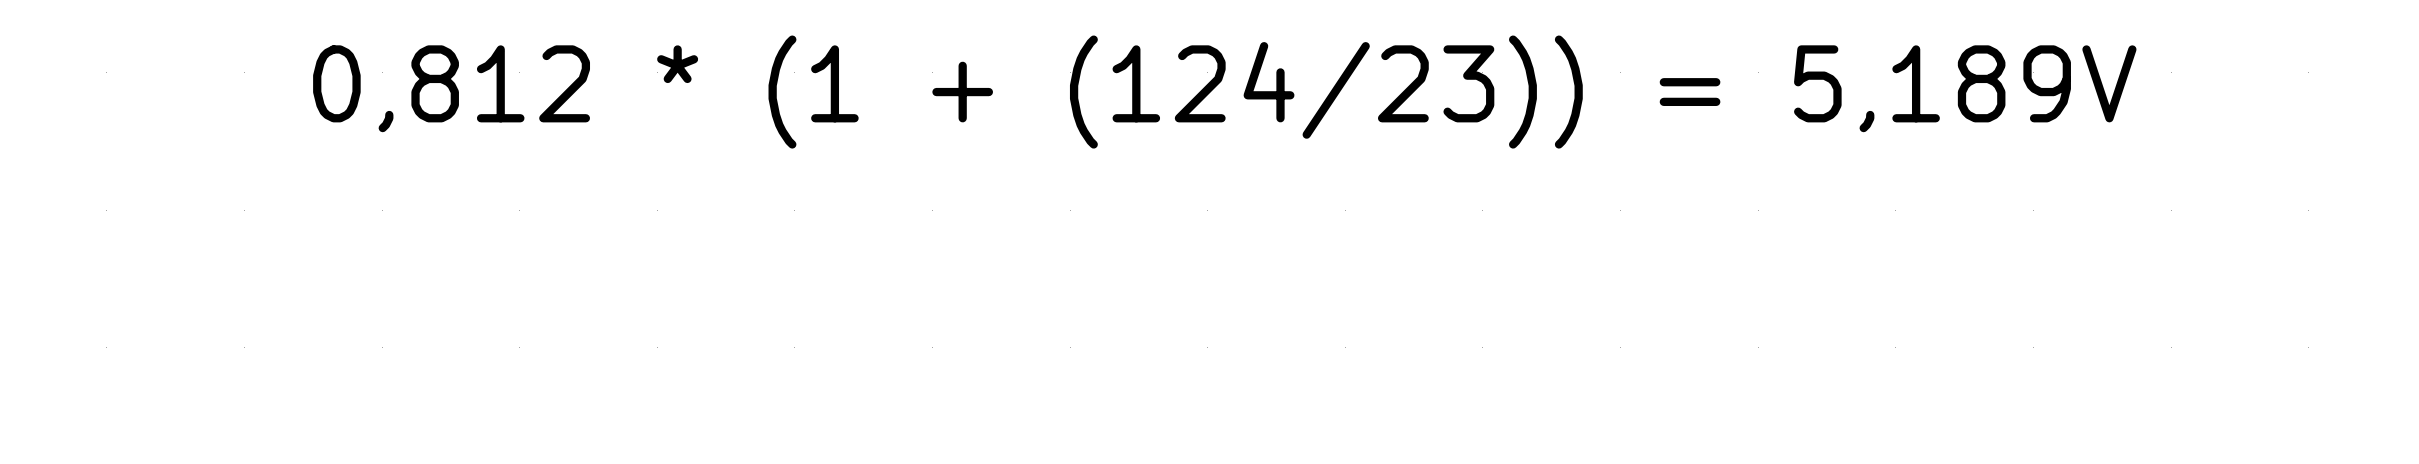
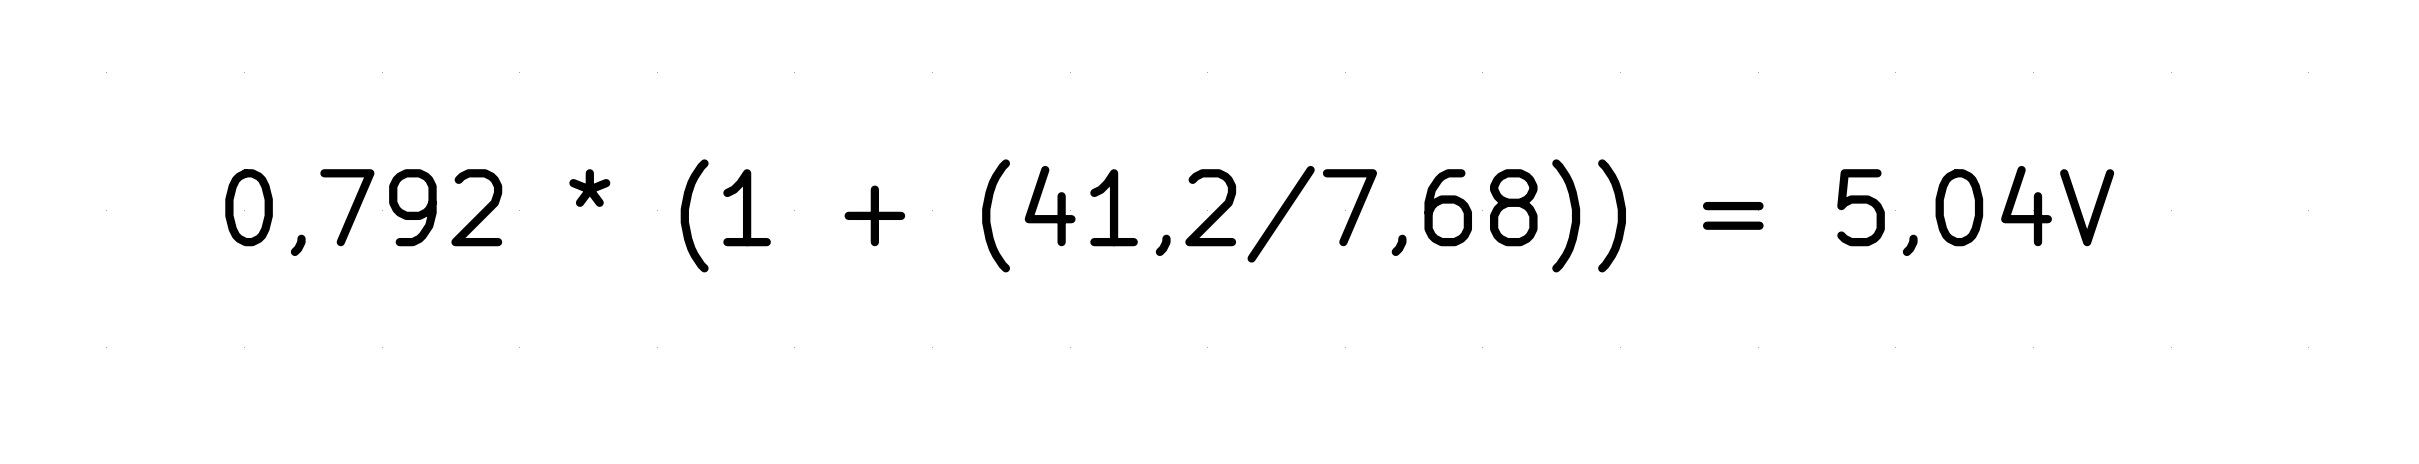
text: 0,812 * (1 + (124/23)) = 5,189V (1224, 92) -> 0,792 * (1 + (41,2/7,68)) = 5,04V (1169, 215)

